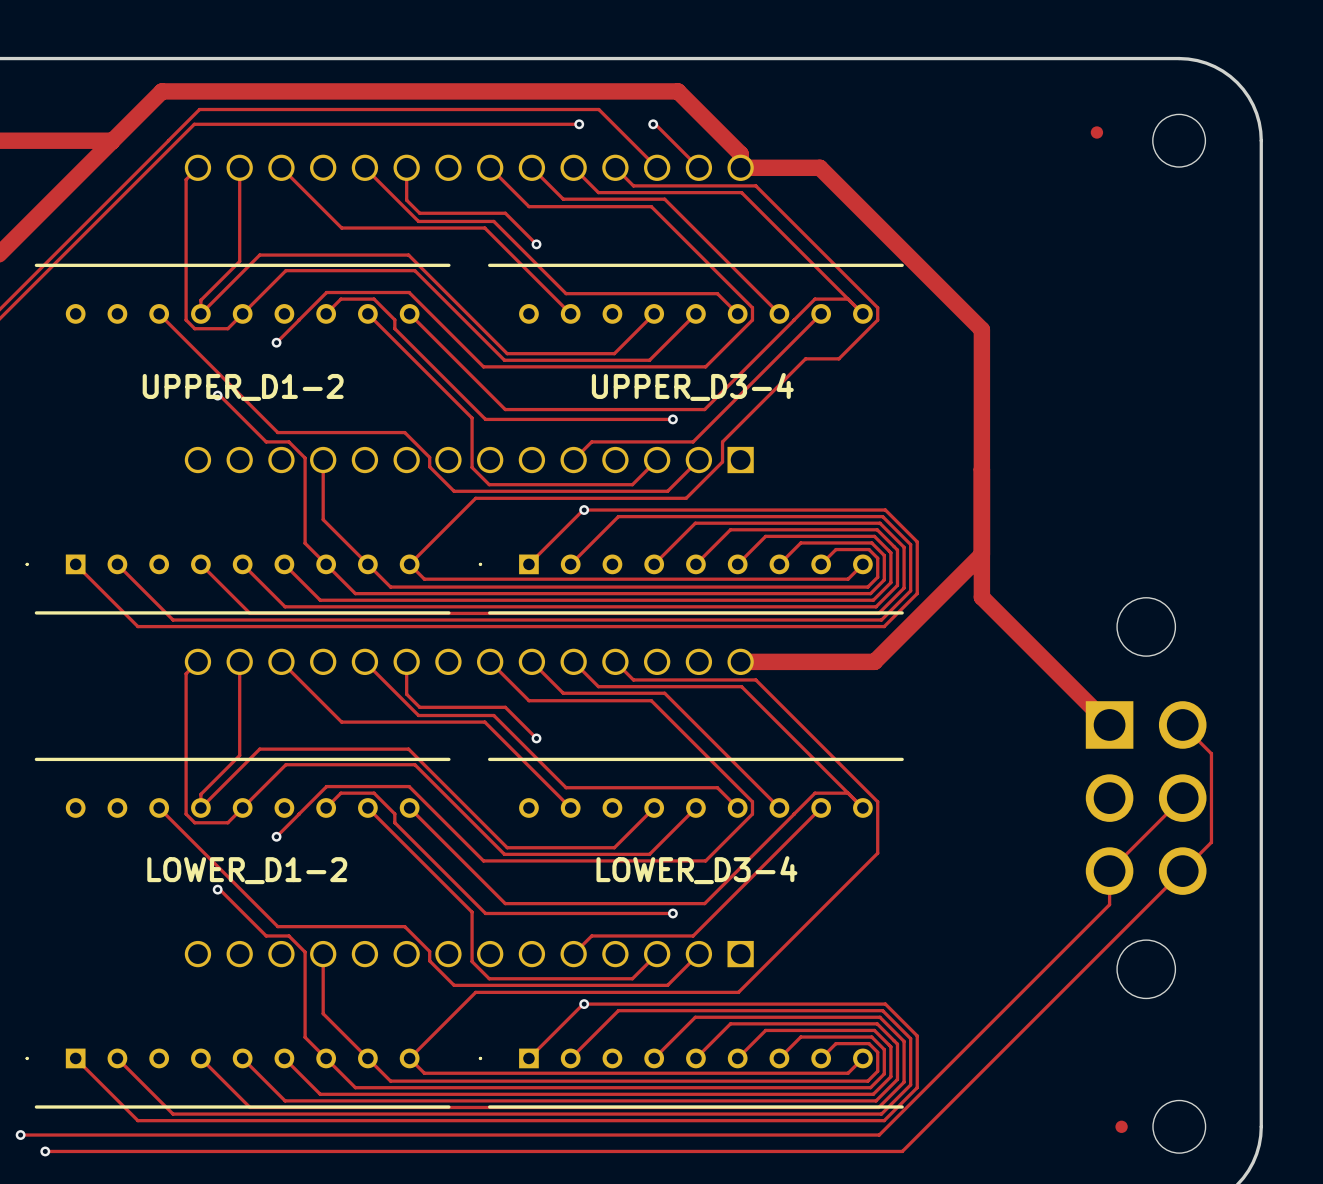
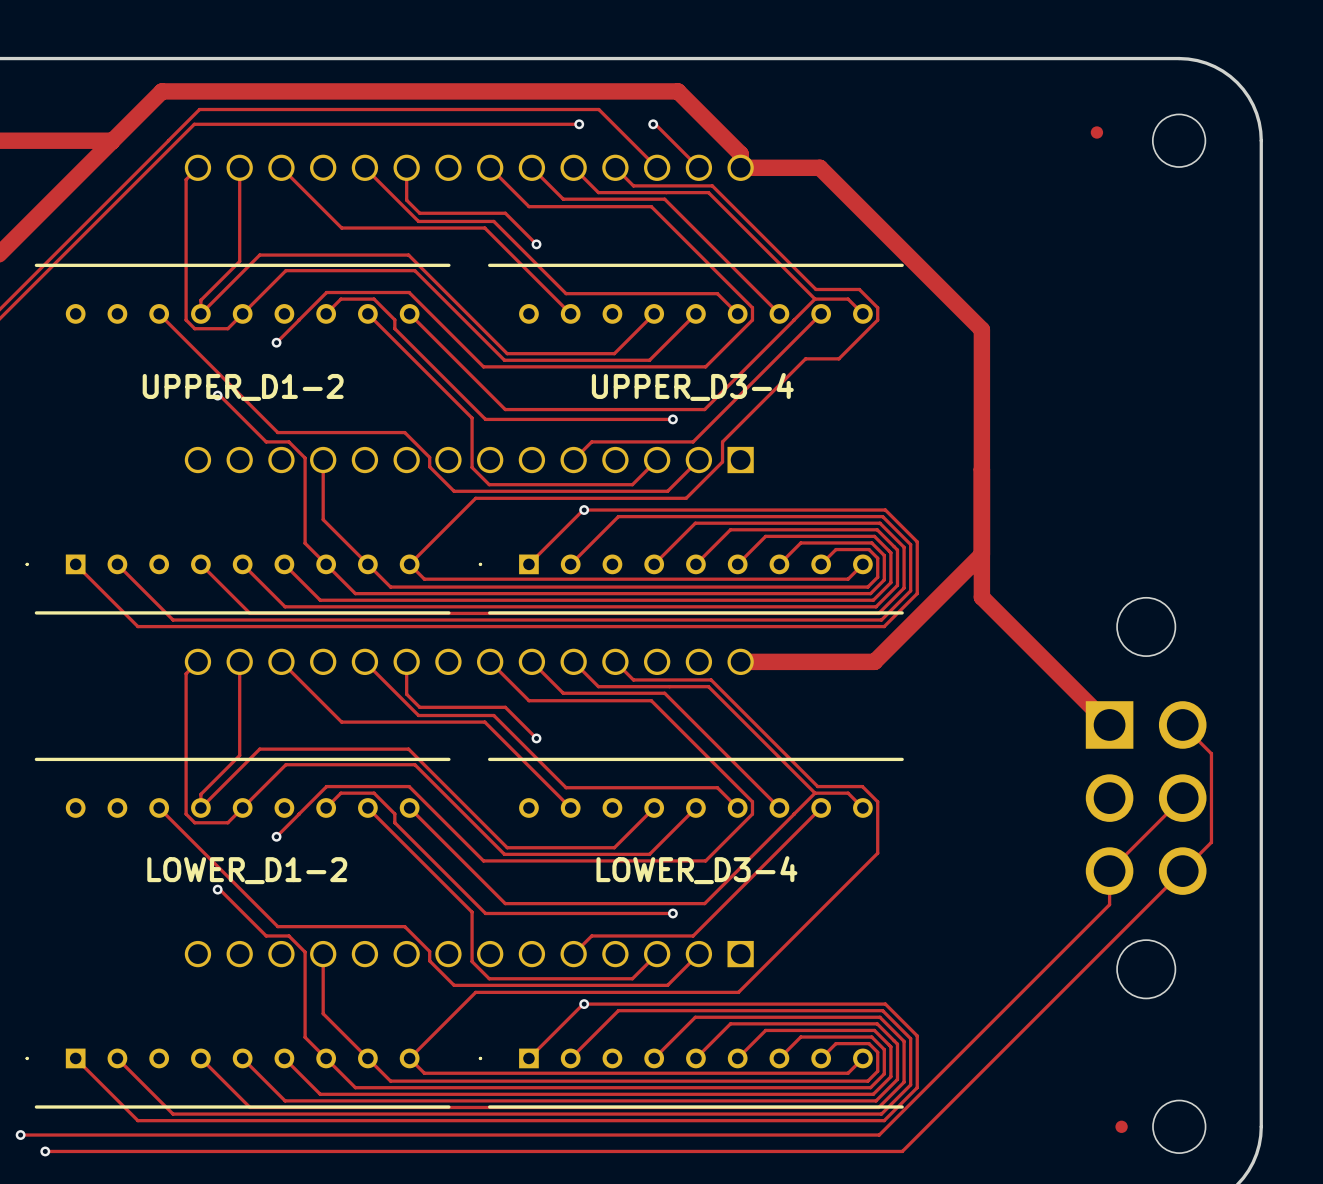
track: (712, 185) (755, 185) (859, 289) -> (712, 185) (815, 289) (859, 289)
track: (708, 192) (741, 192) (848, 299) -> (708, 192) (815, 299)
track: (711, 679) (755, 679) (862, 786) -> (711, 679) (817, 786) (862, 786)
track: (708, 686) (741, 686) (848, 793) -> (708, 686) (815, 793)

